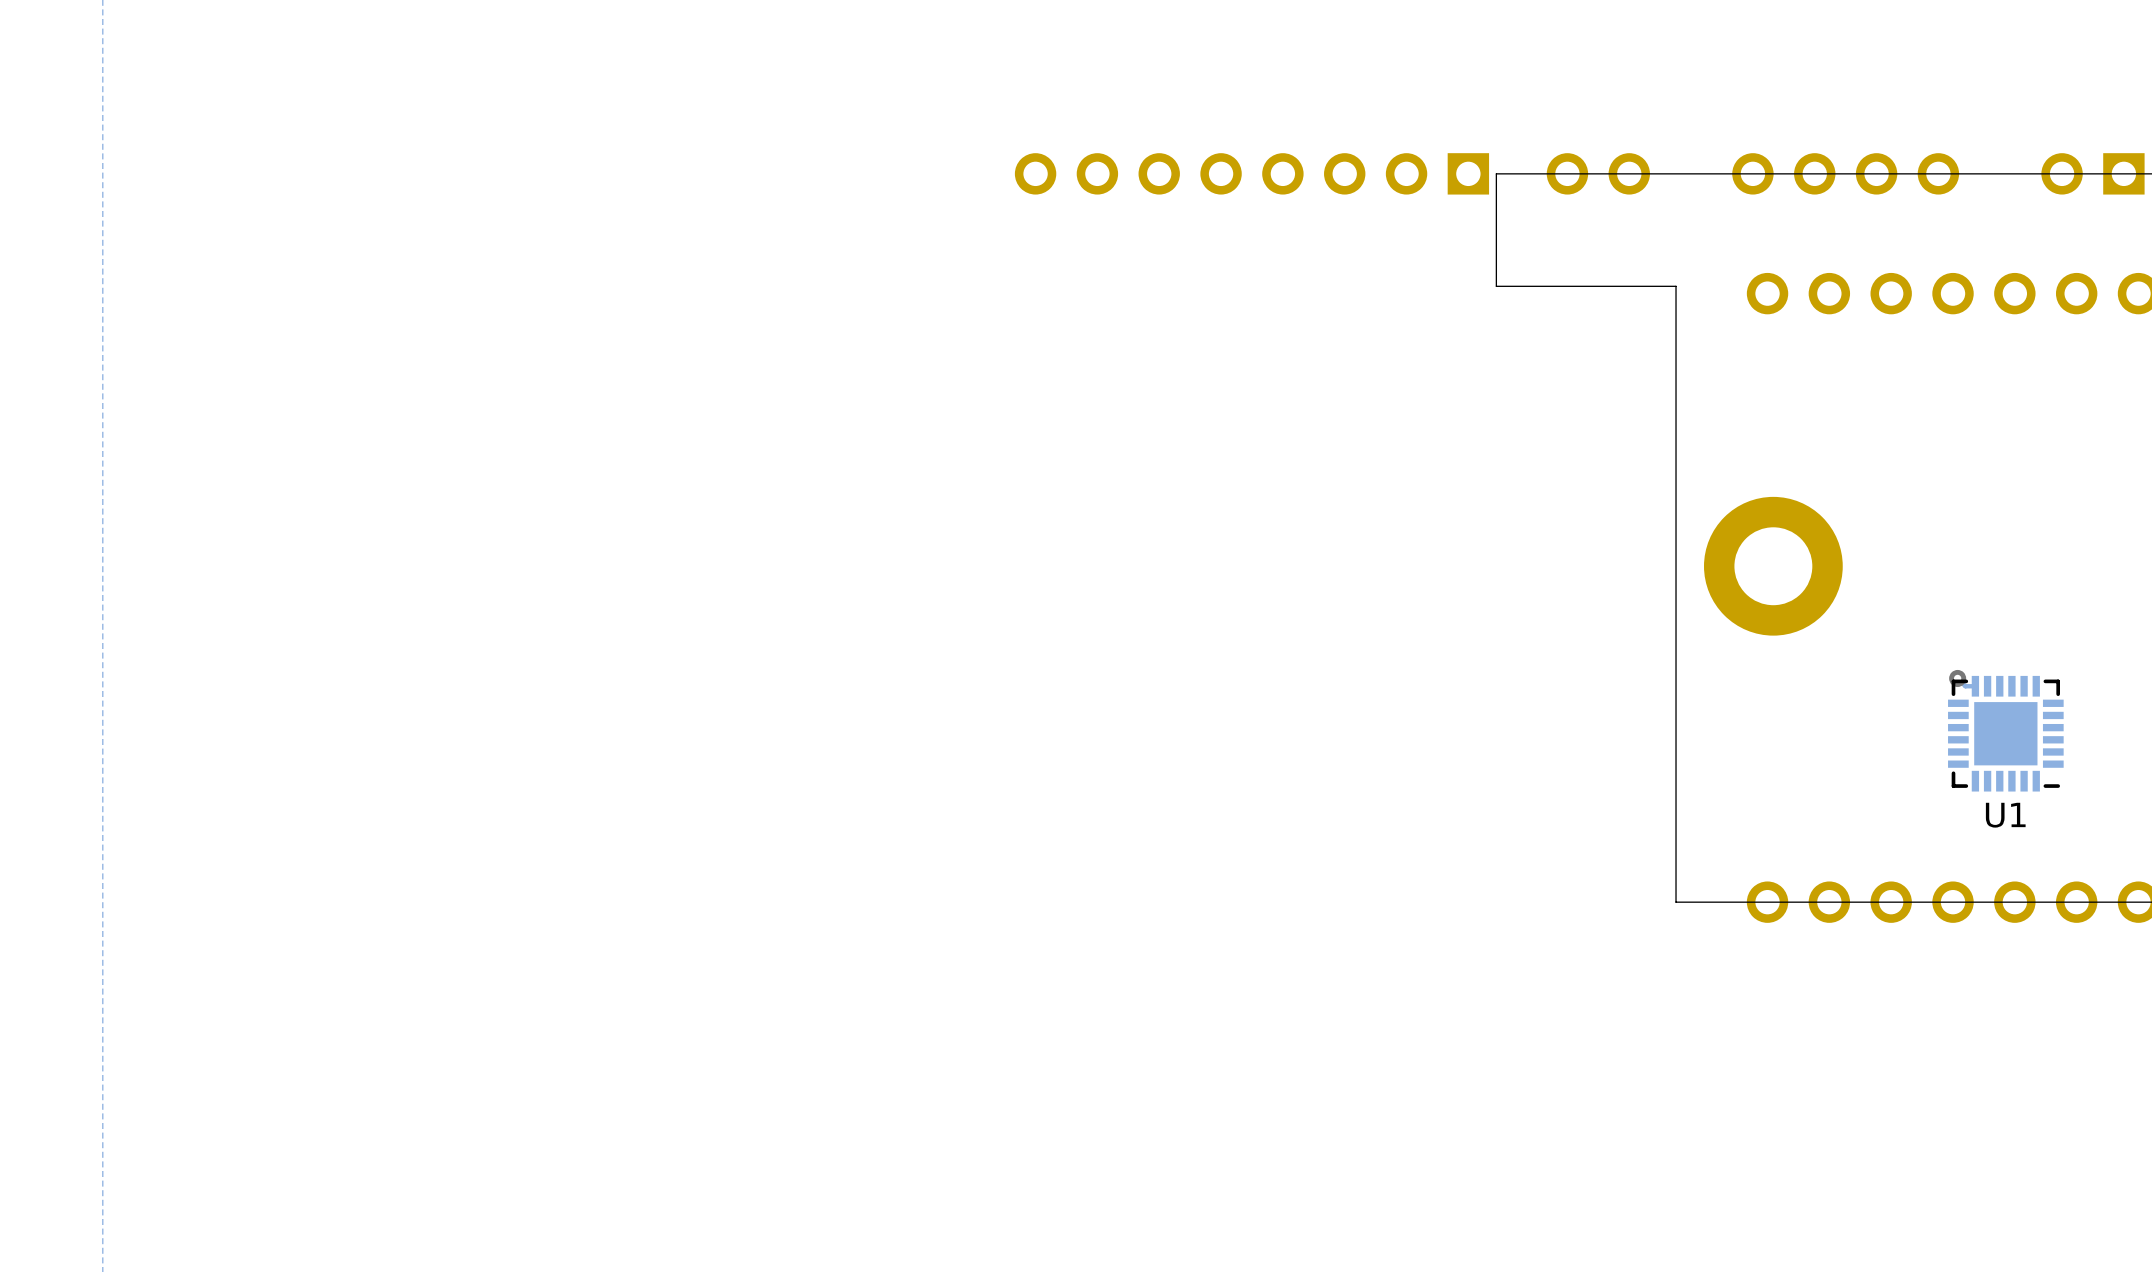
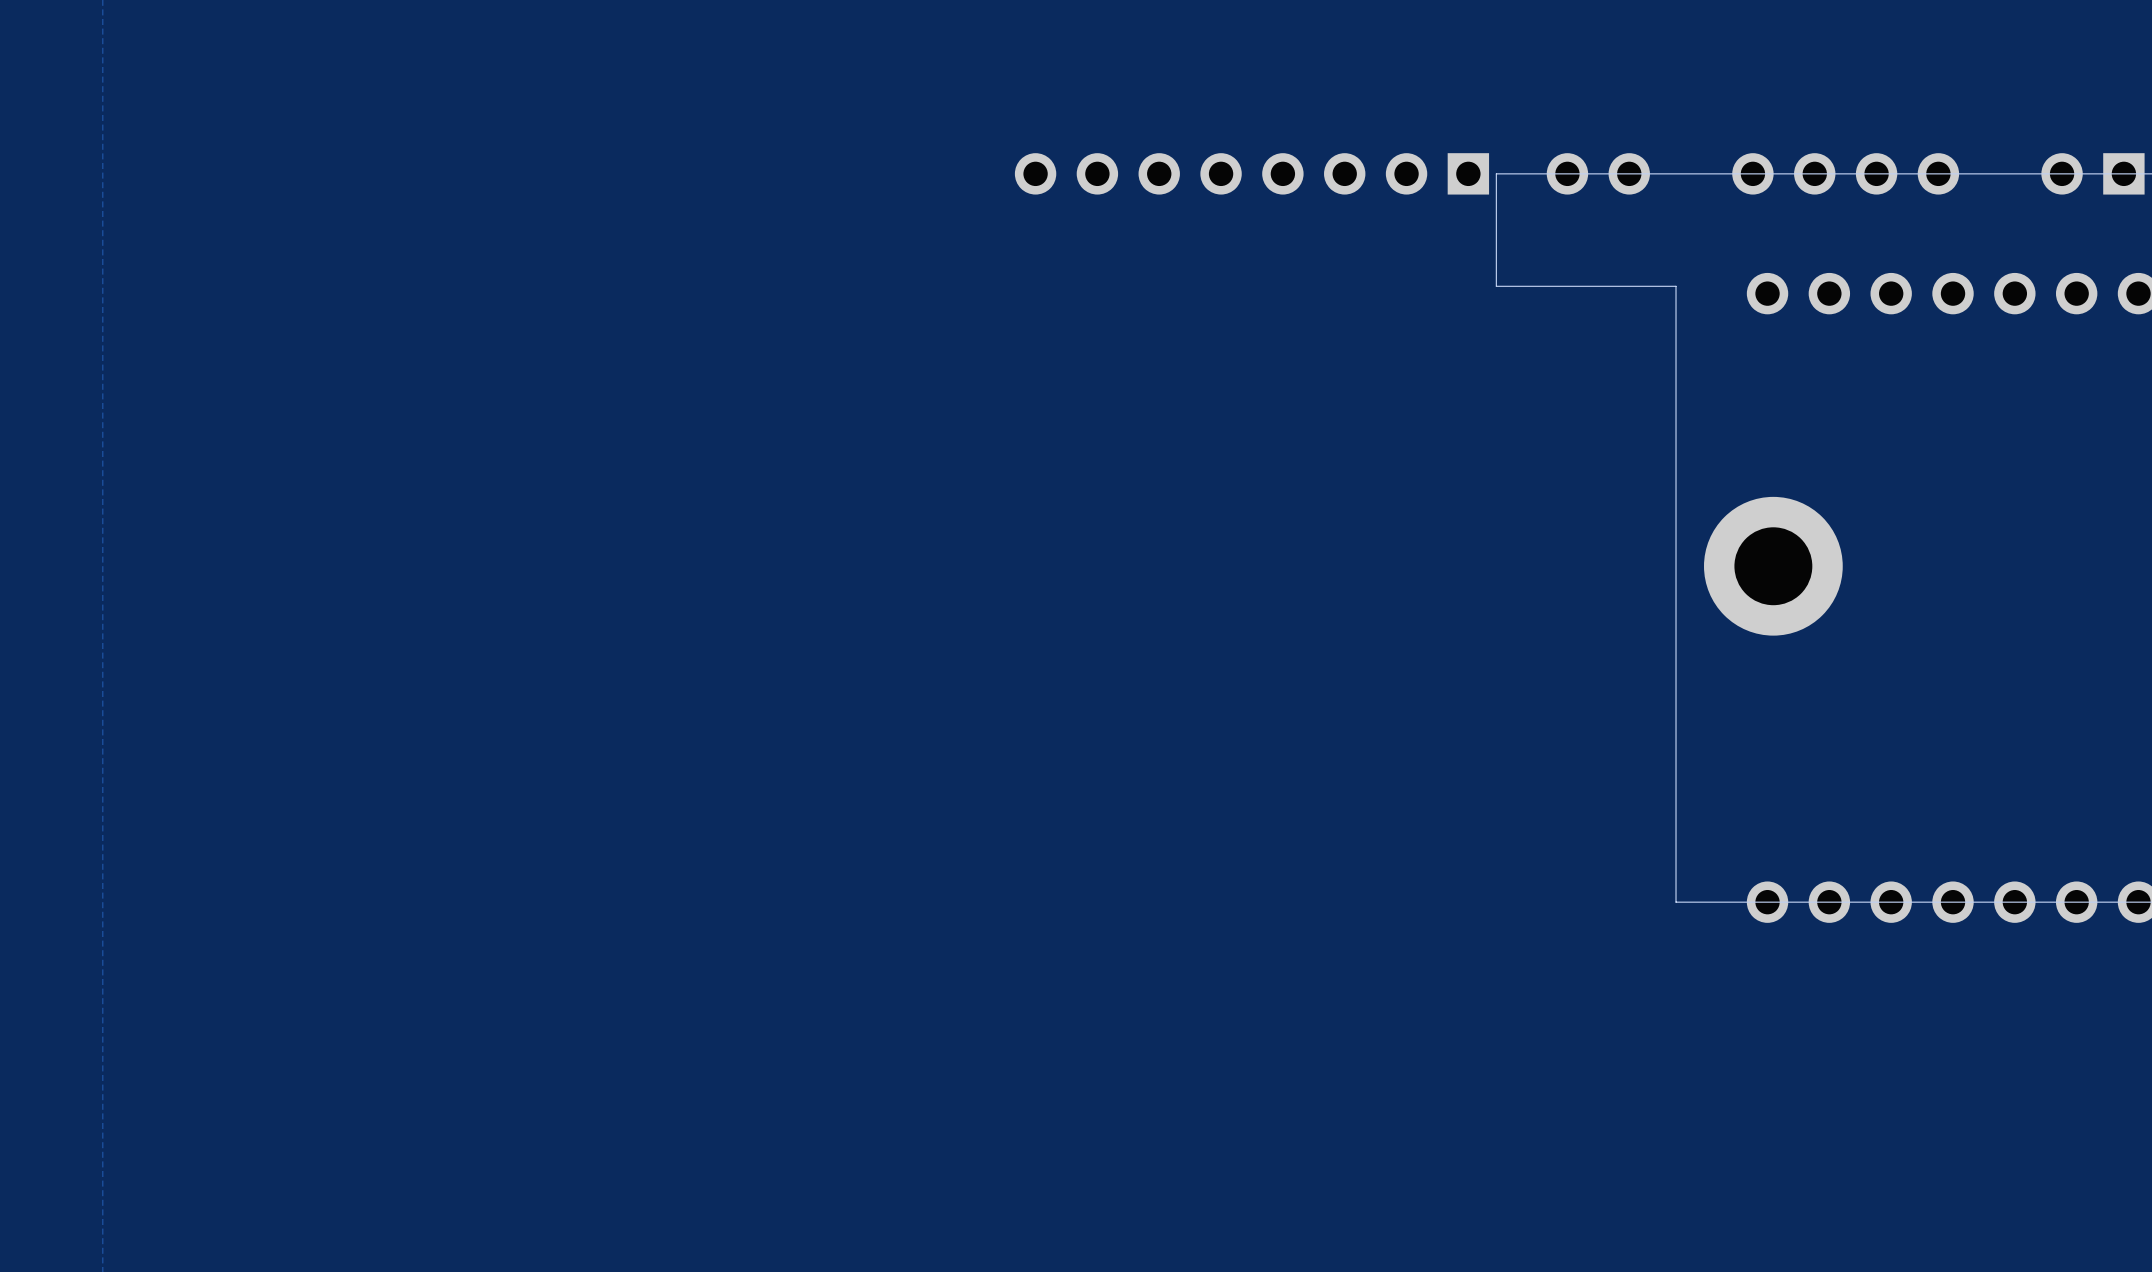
track: (1957, 678) (1965, 686) (1975, 686) -> none
via: (1957, 678) -> none
U1: (2005, 733) -> none

